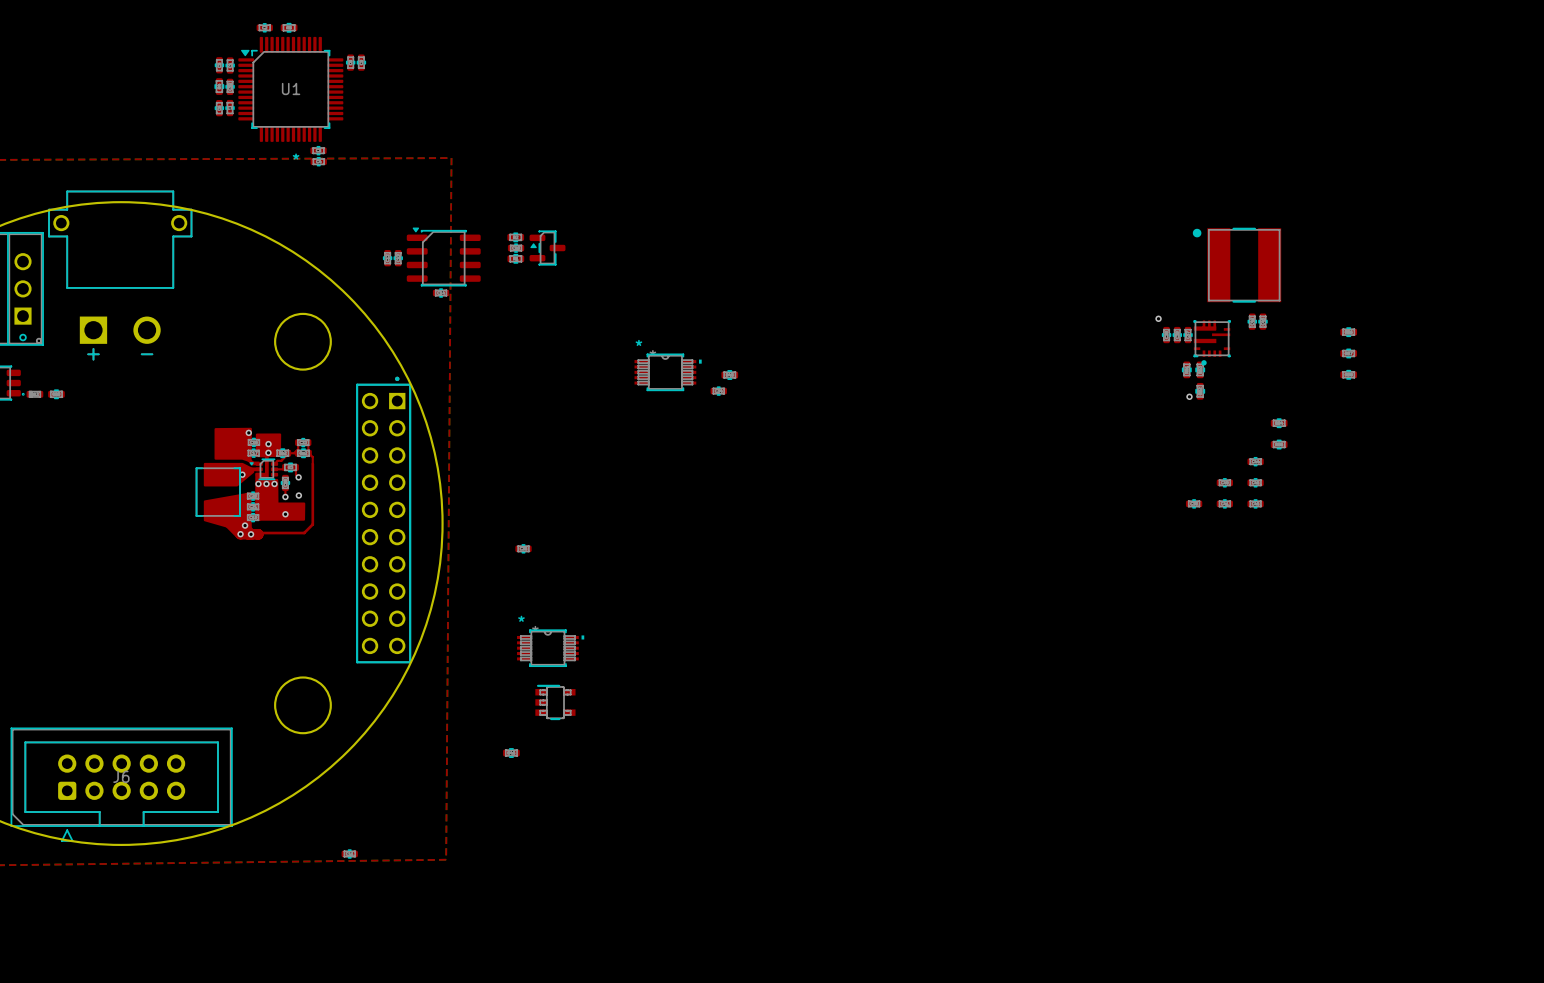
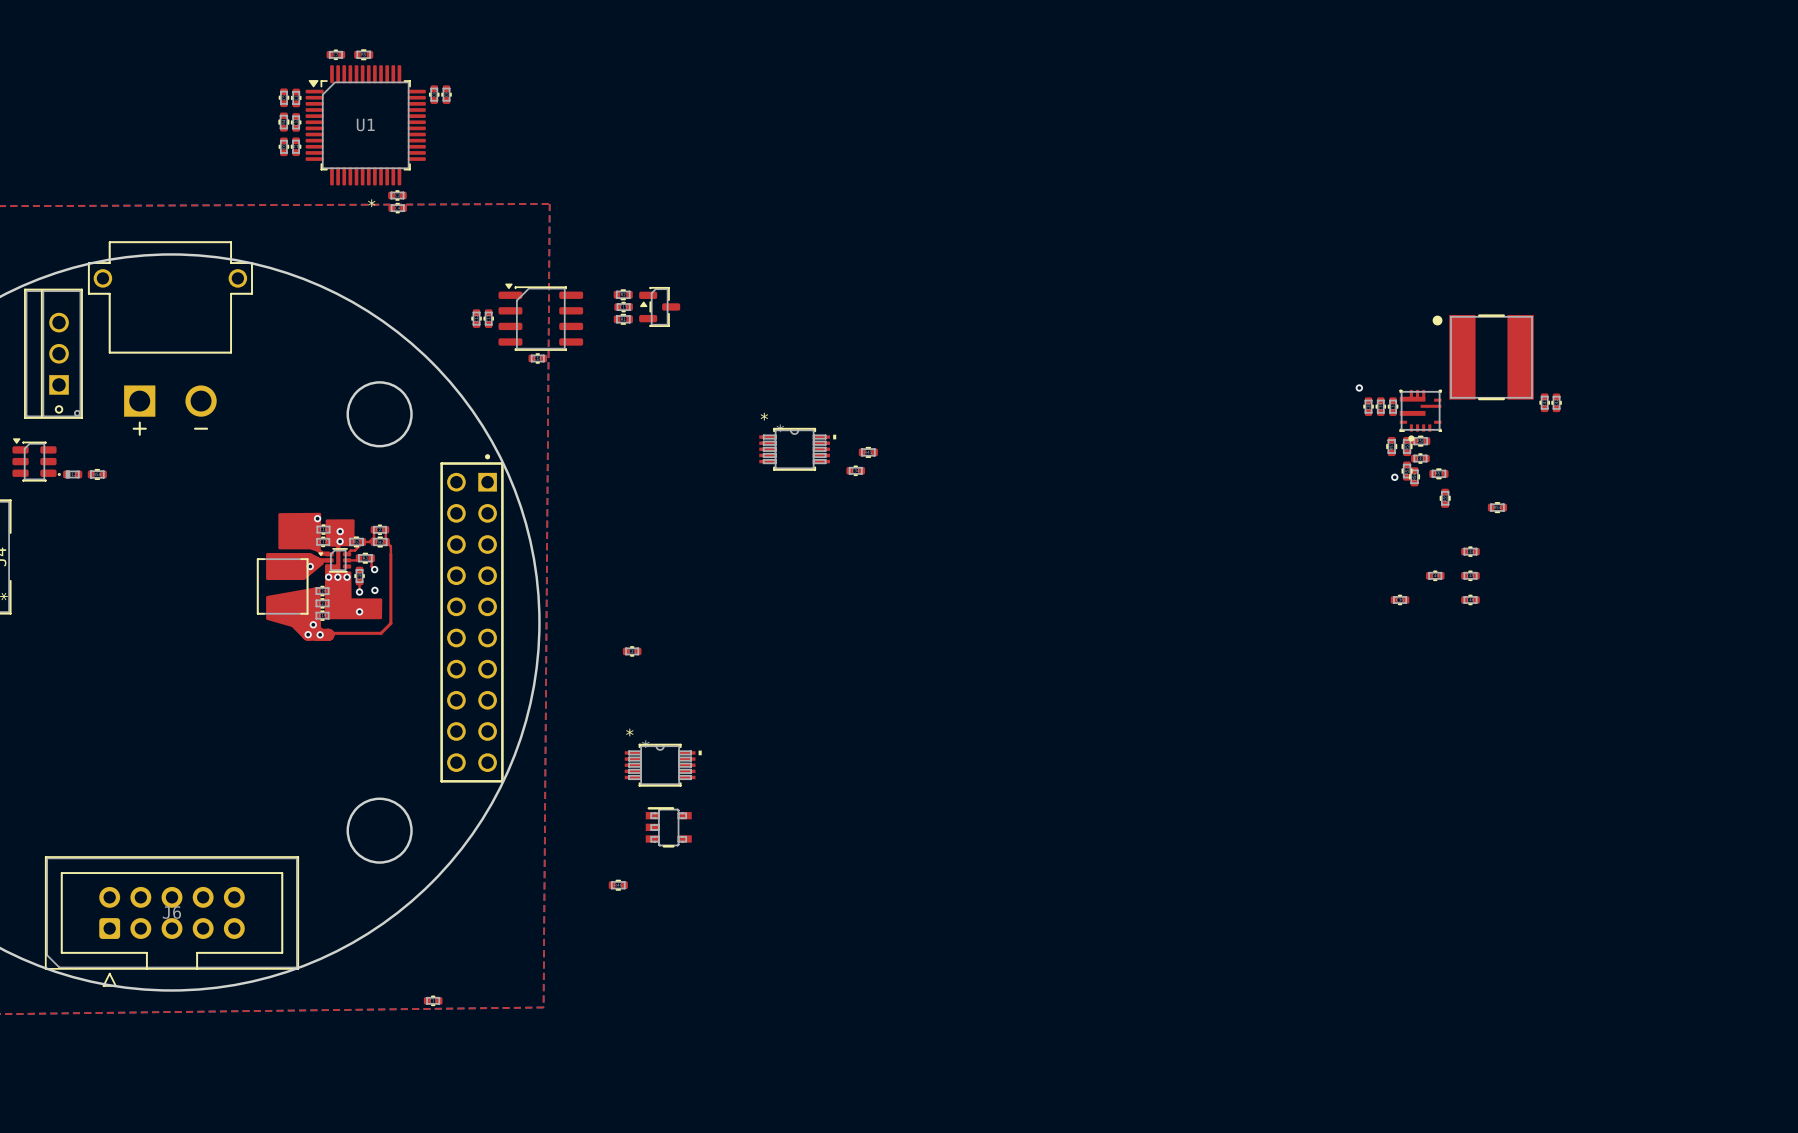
part position: (1237, 265) -> (1483, 357)
part position: (1252, 321) -> (1556, 402)
part position: (1262, 321) -> (1544, 402)
part rotation: 0° (1348, 332) -> 90° clockwise (1414, 476)
part position: (1348, 332) -> (1414, 476)
part position: (1348, 353) -> (1438, 473)
part position: (1348, 374) -> (1420, 441)
part rotation: 0° (1279, 444) -> 90° clockwise (1445, 498)
part position: (1279, 444) -> (1445, 498)
part position: (1224, 503) -> (1420, 458)

